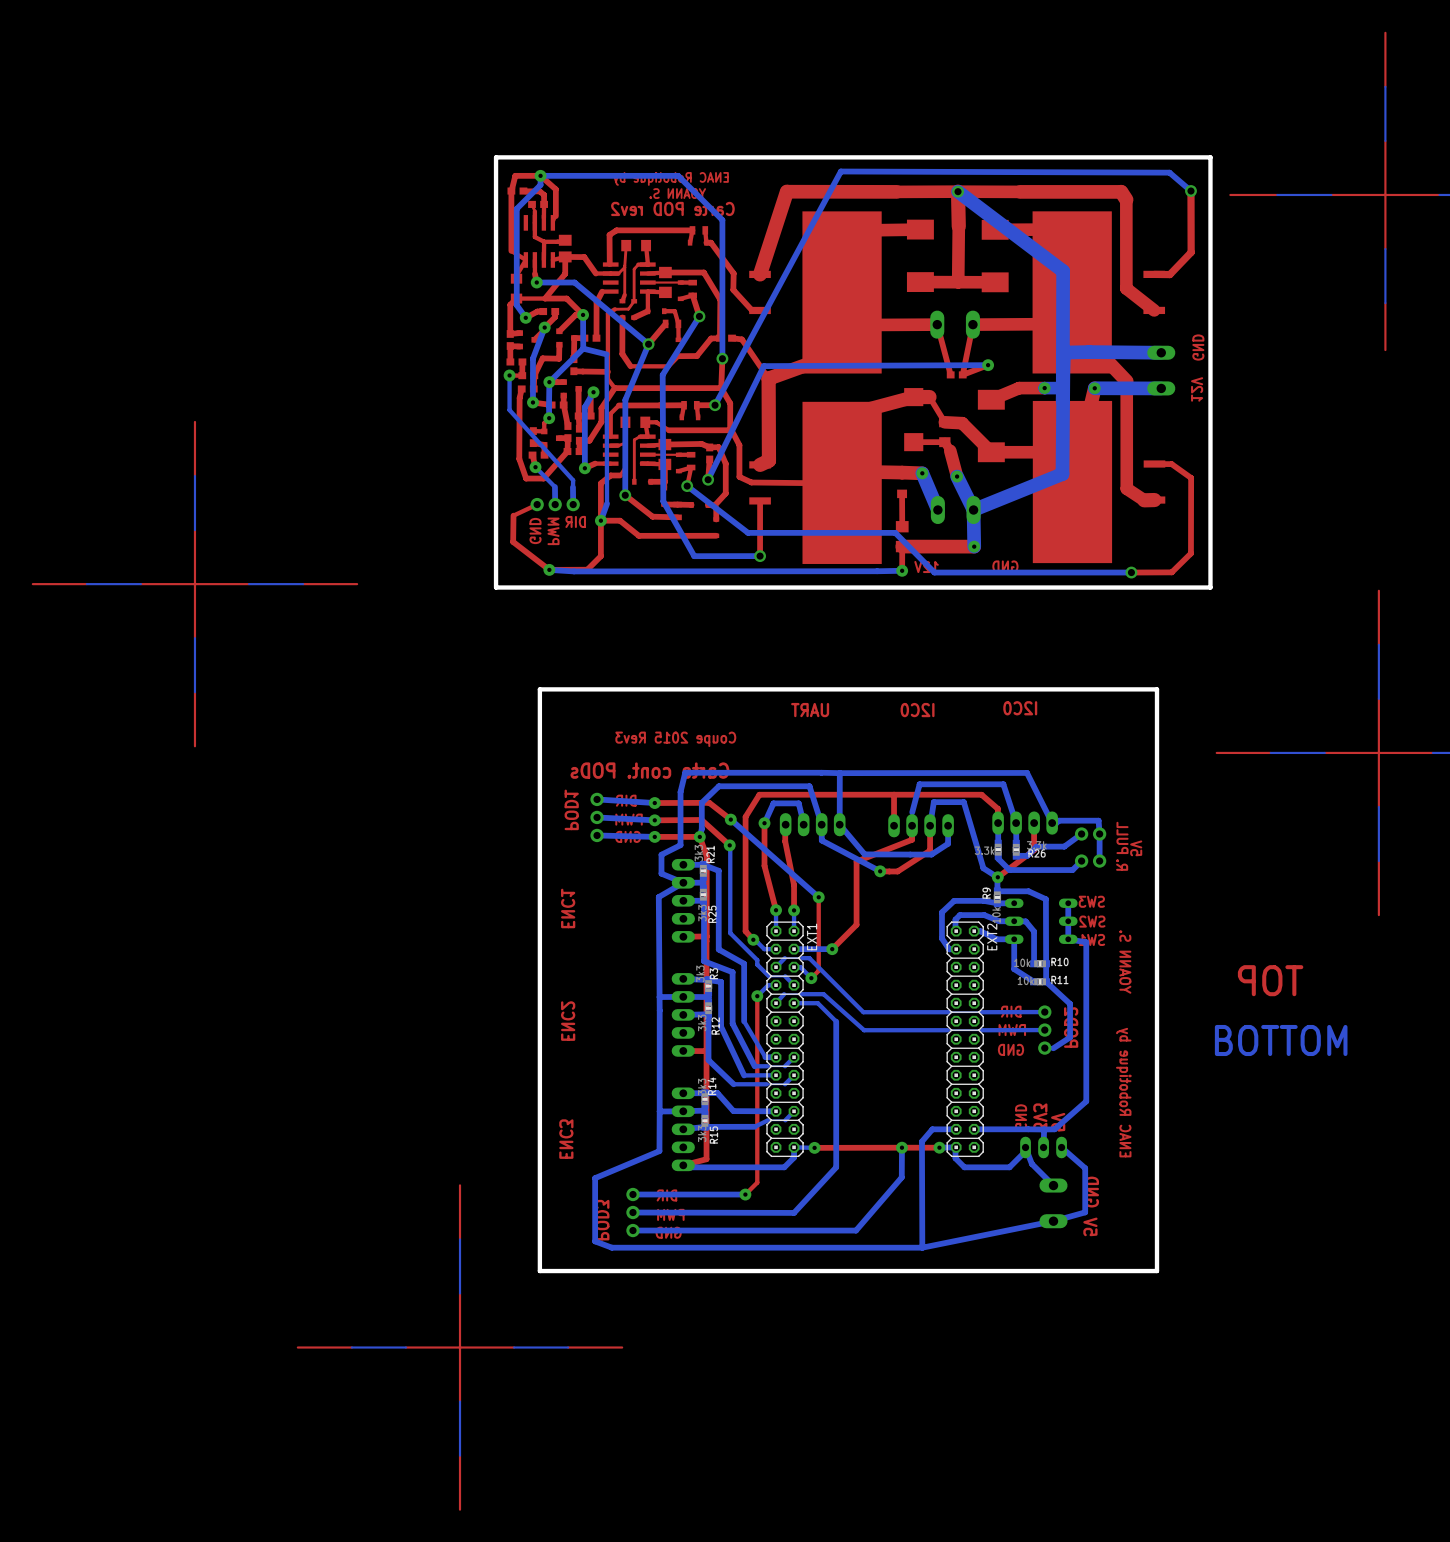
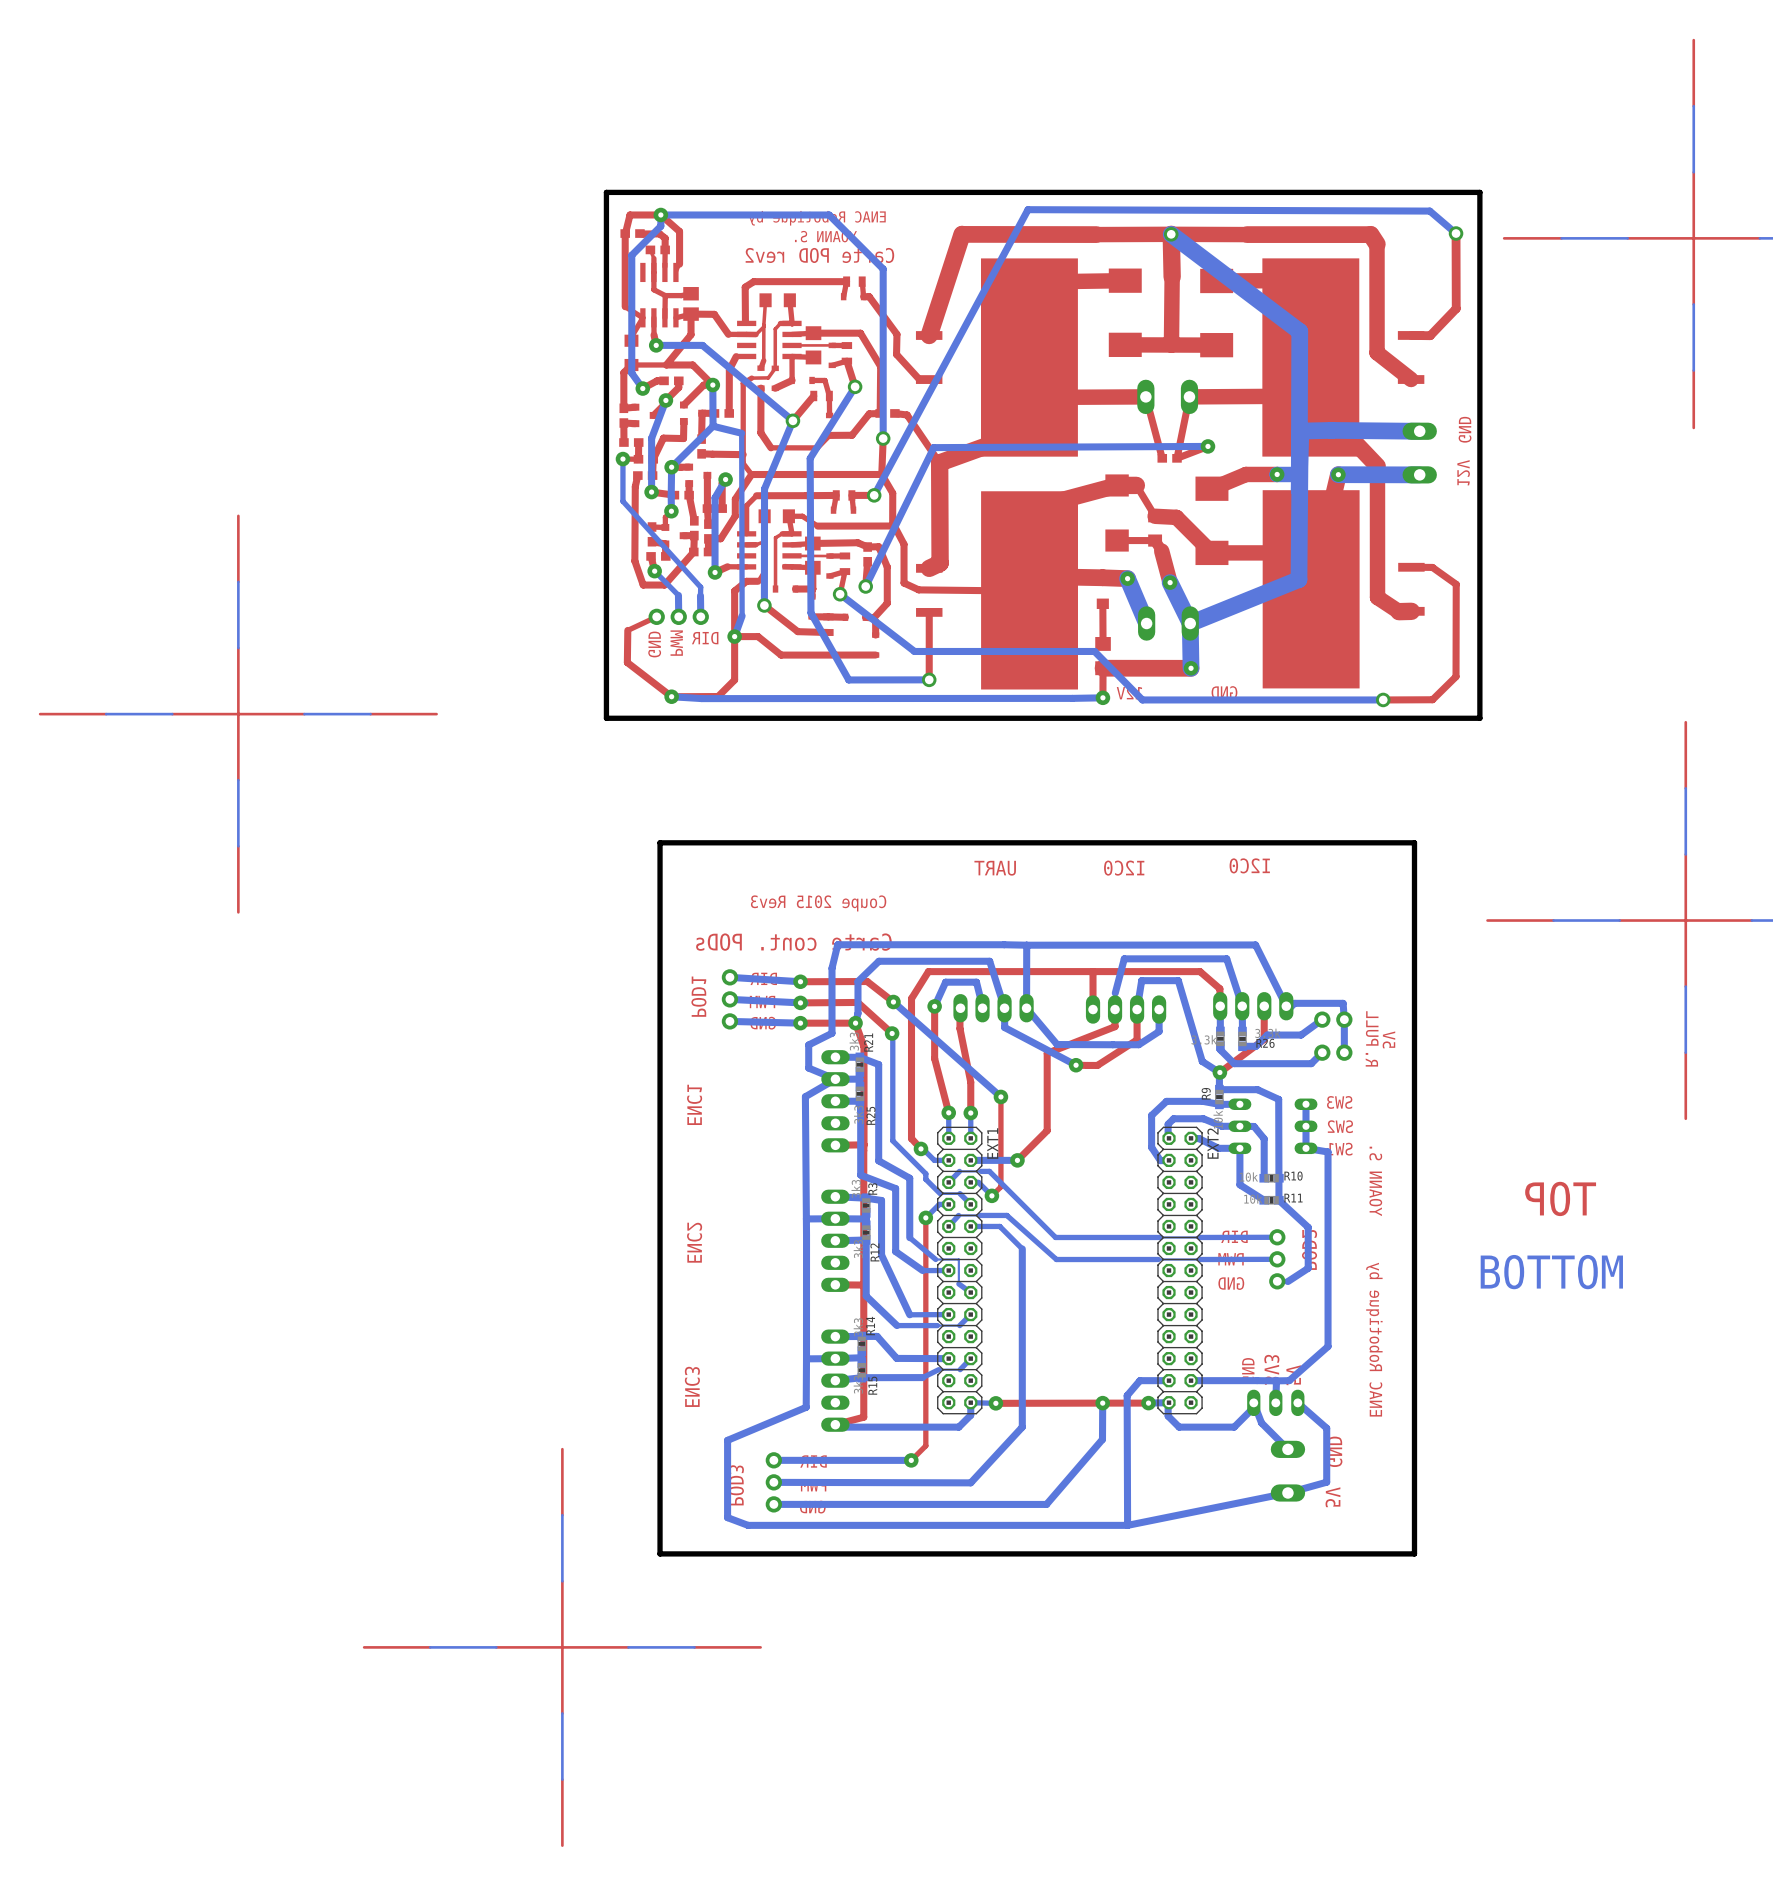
bottom track: (744, 1012) (744, 1021) (765, 1057) (776, 1057) -> none
bottom track: (732, 1023) (754, 1066) (785, 1066) (794, 1057) -> (909, 1237) (935, 1259) (958, 1259) (958, 1283) (970, 1292)
bottom track: none -> (895, 1251) (922, 1270) (948, 1270)

